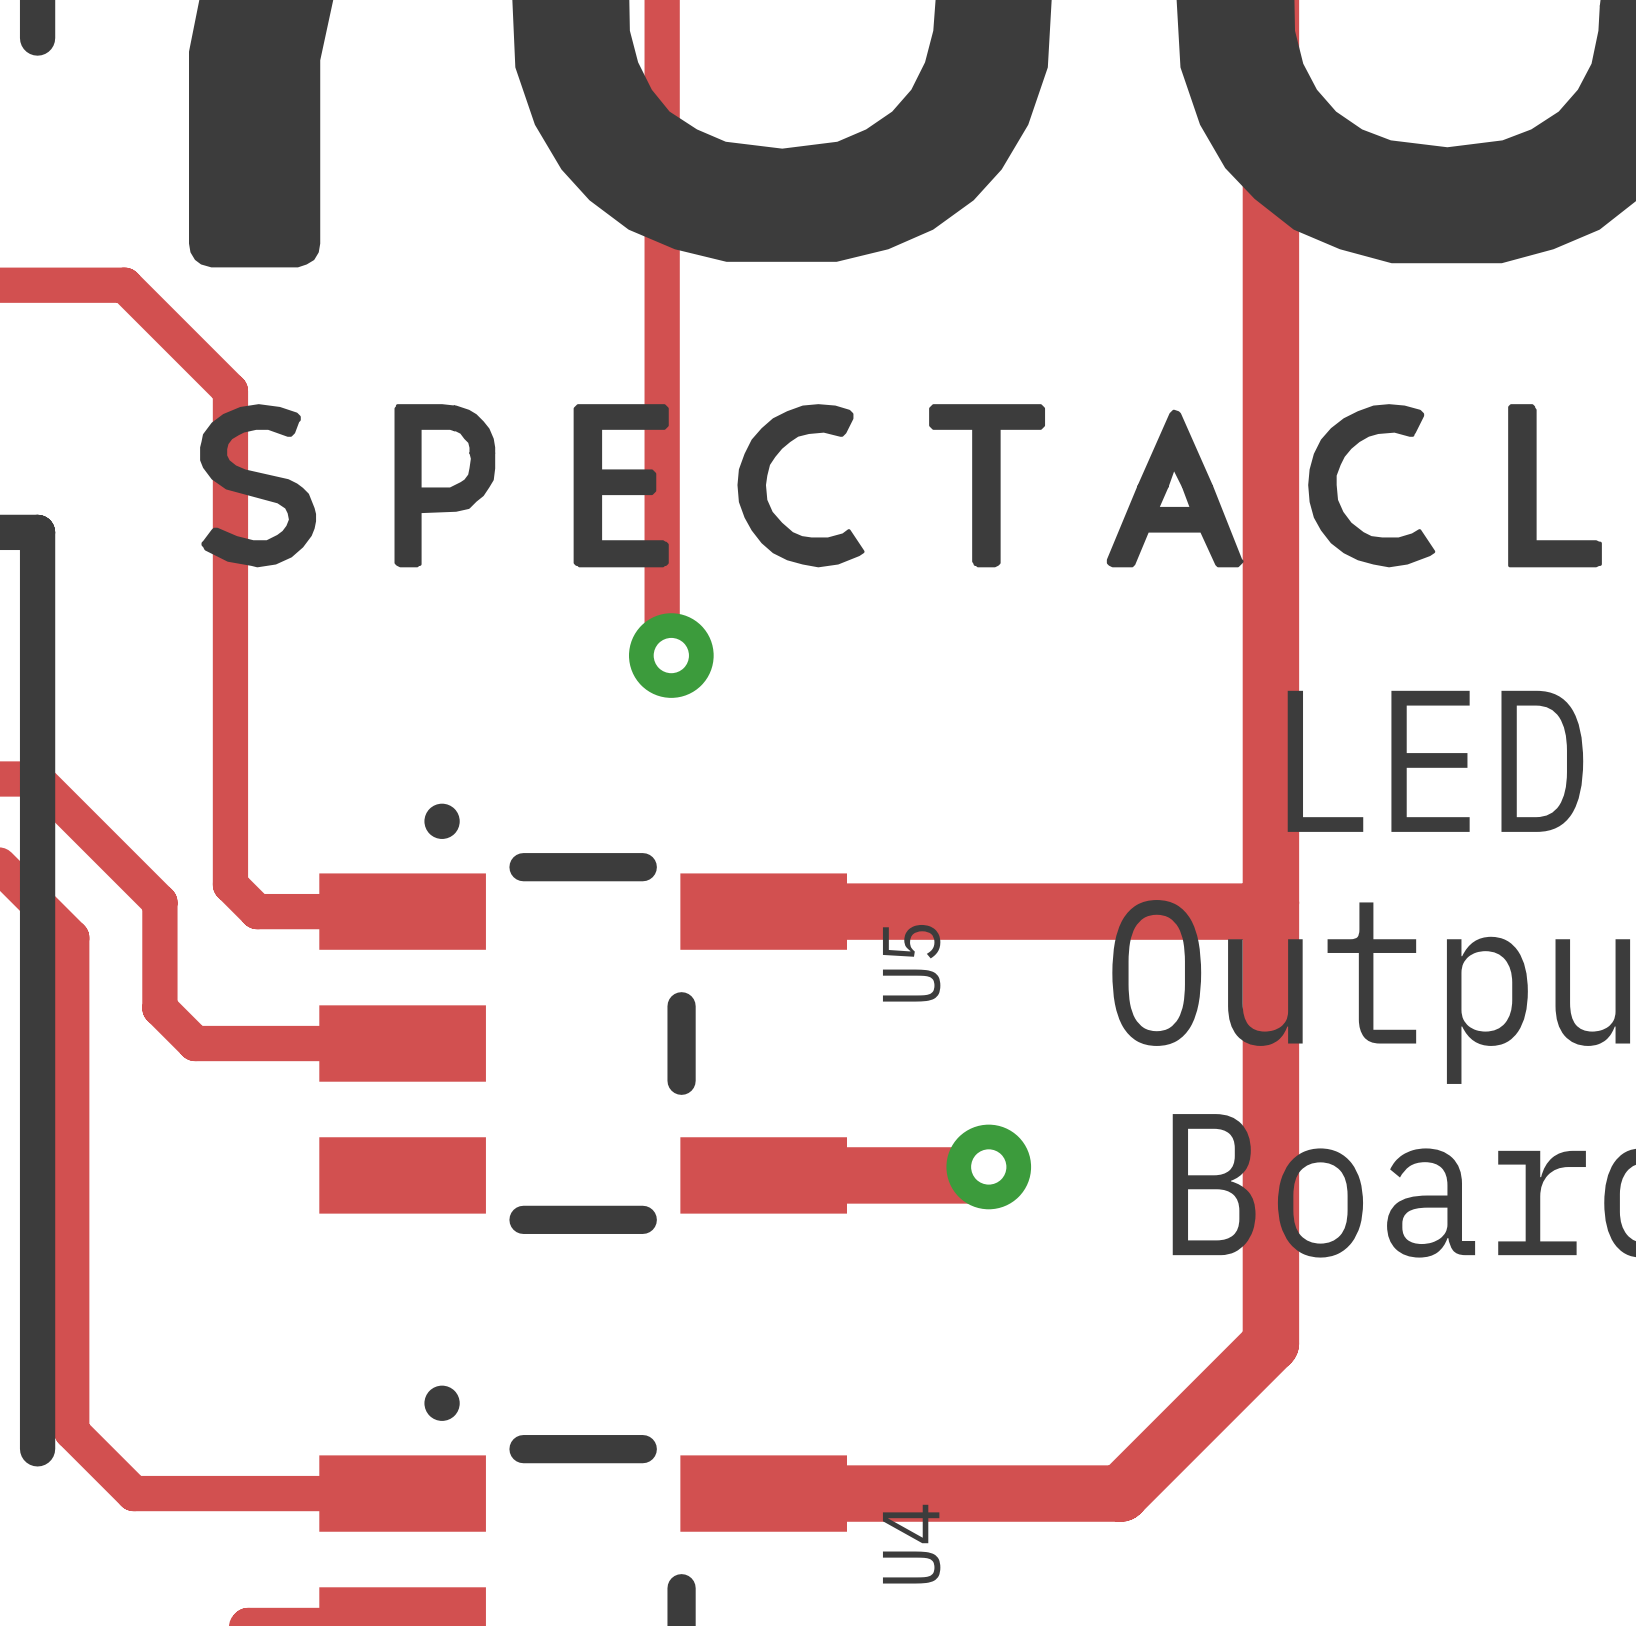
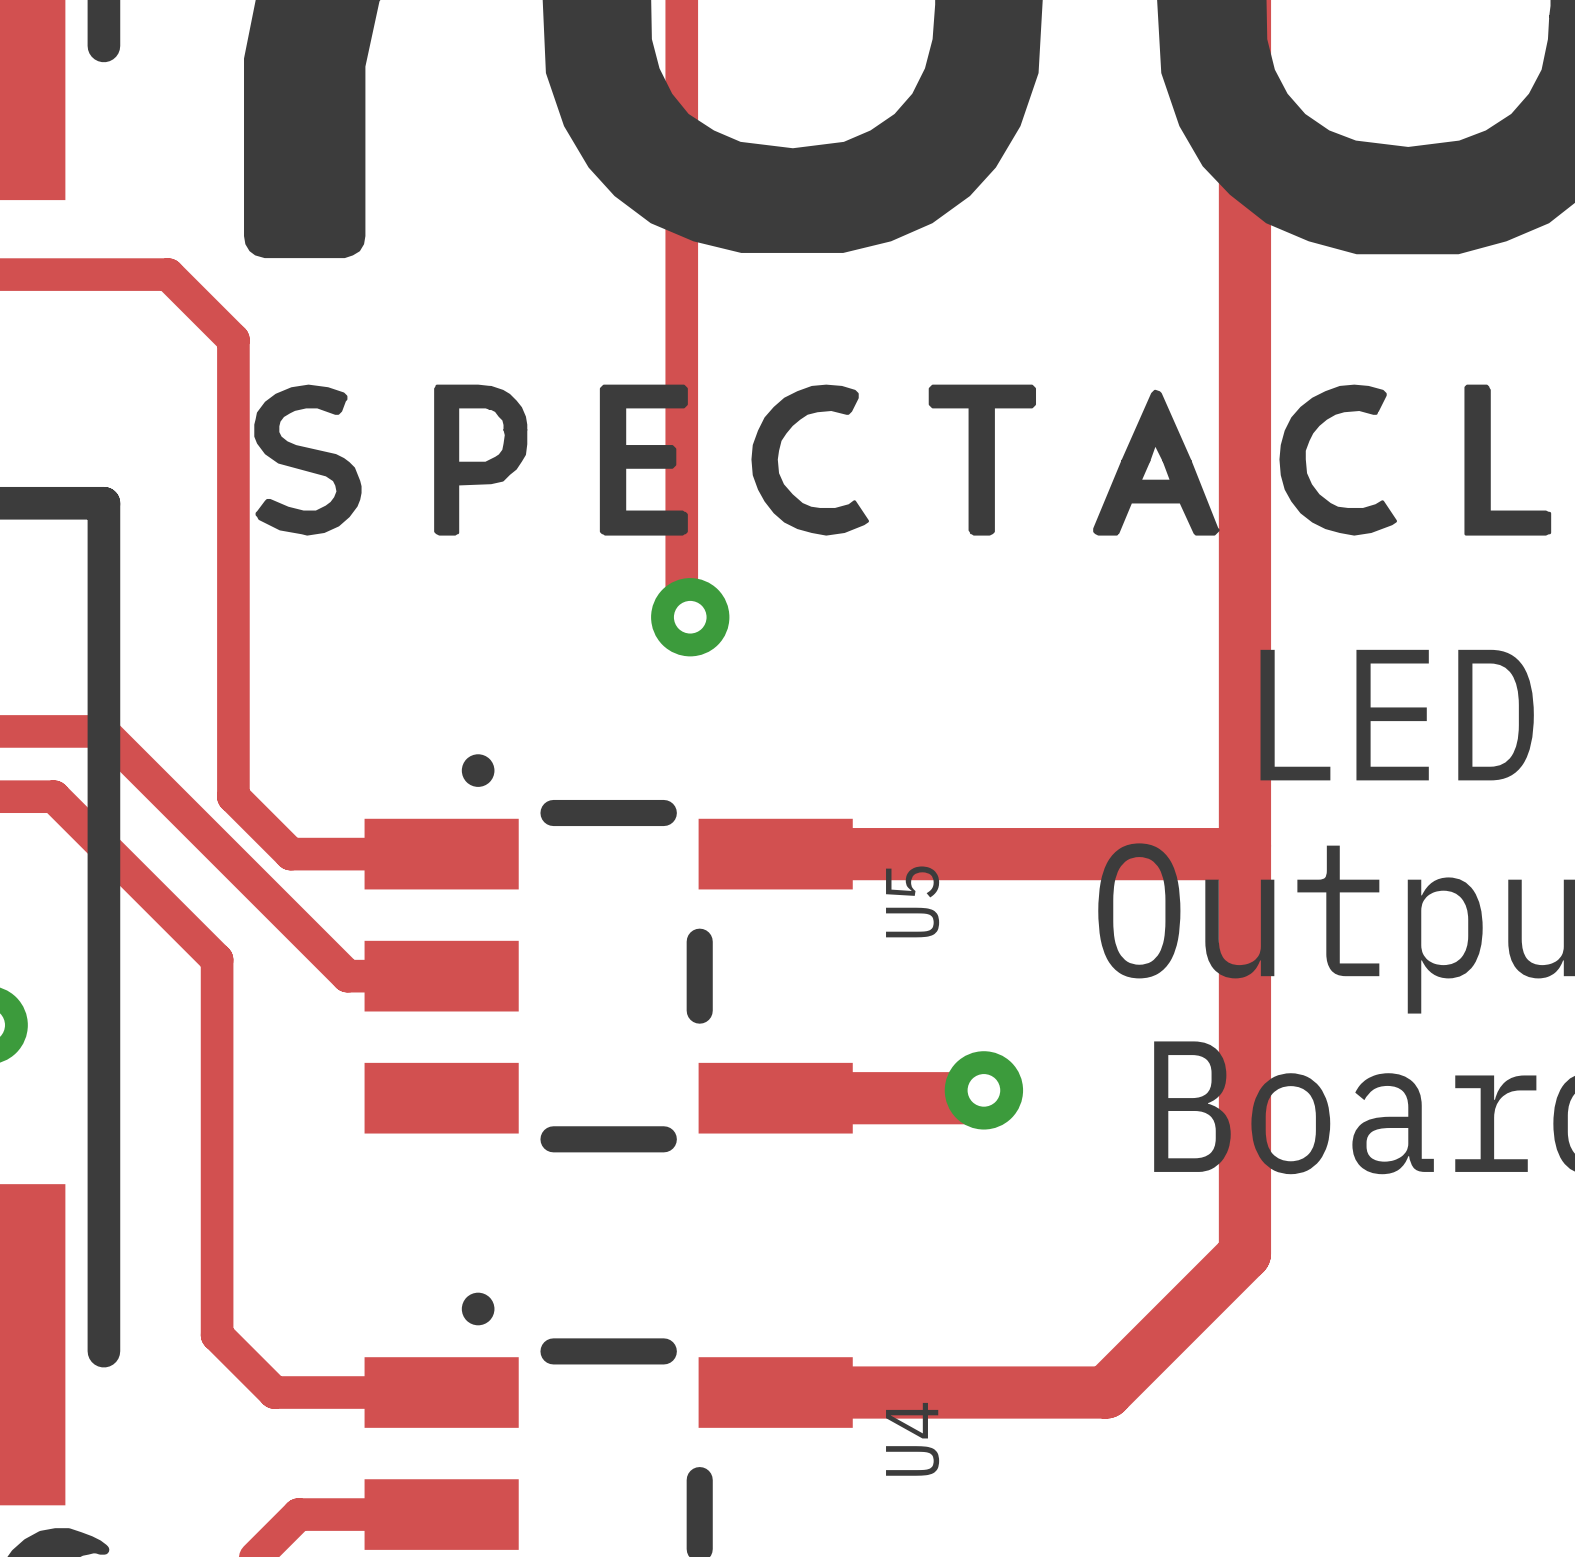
track: (107, 285) (124, 285) (230, 391) (230, 884) (257, 911) -> (168, 274) (233, 339) (233, 796) (290, 854) (307, 854)
track: (159, 902) (159, 1008) (195, 1043) (300, 1043) -> (217, 845) (347, 976)
track: (71, 937) (71, 1431) (133, 1493) (221, 1493) -> (135, 878) (217, 959) (217, 1335) (274, 1392)

